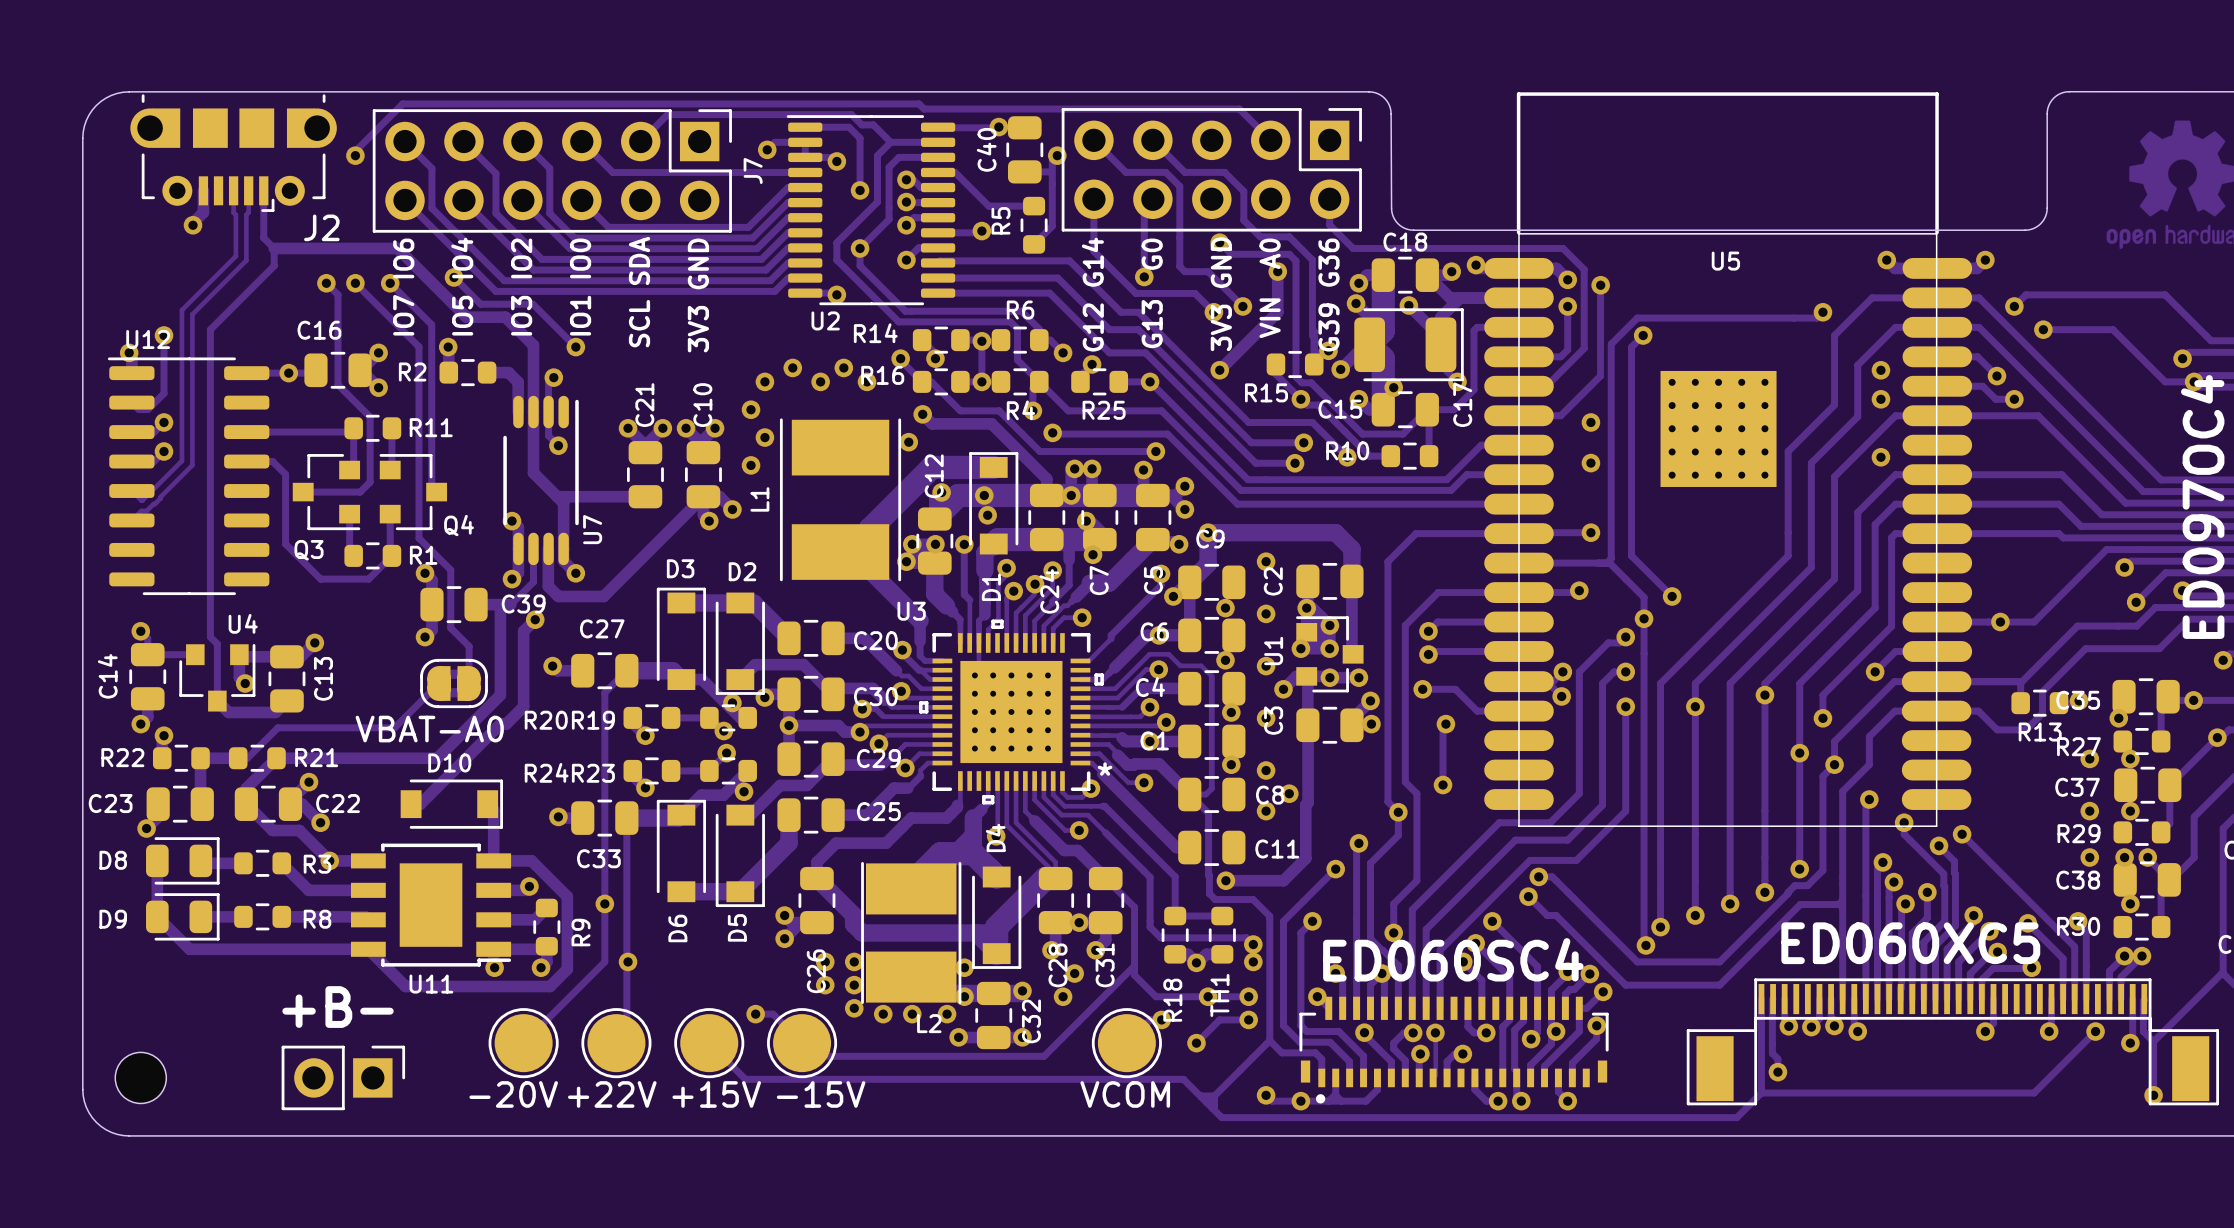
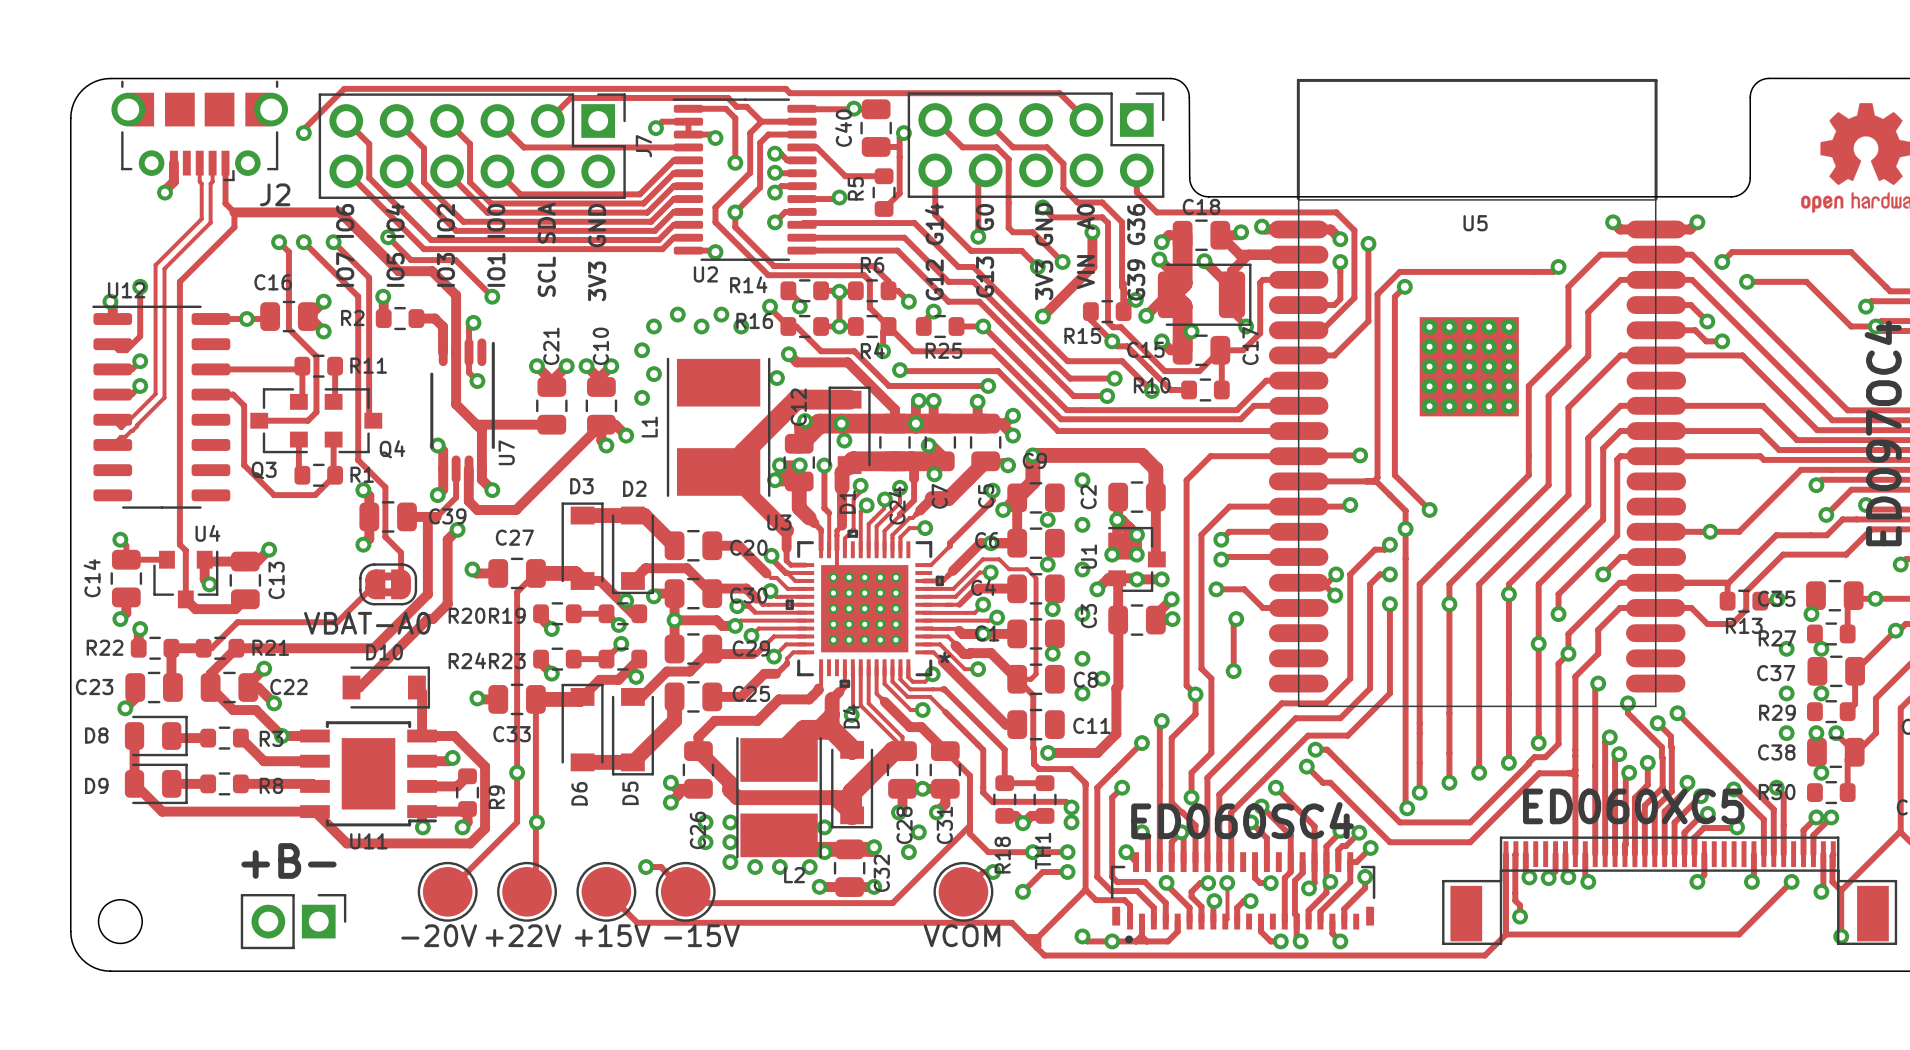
via: (1880, 370) -> none
via: (1880, 399) -> none
via: (1590, 422) -> none
via: (1880, 457) -> none
via: (1590, 463) -> none

